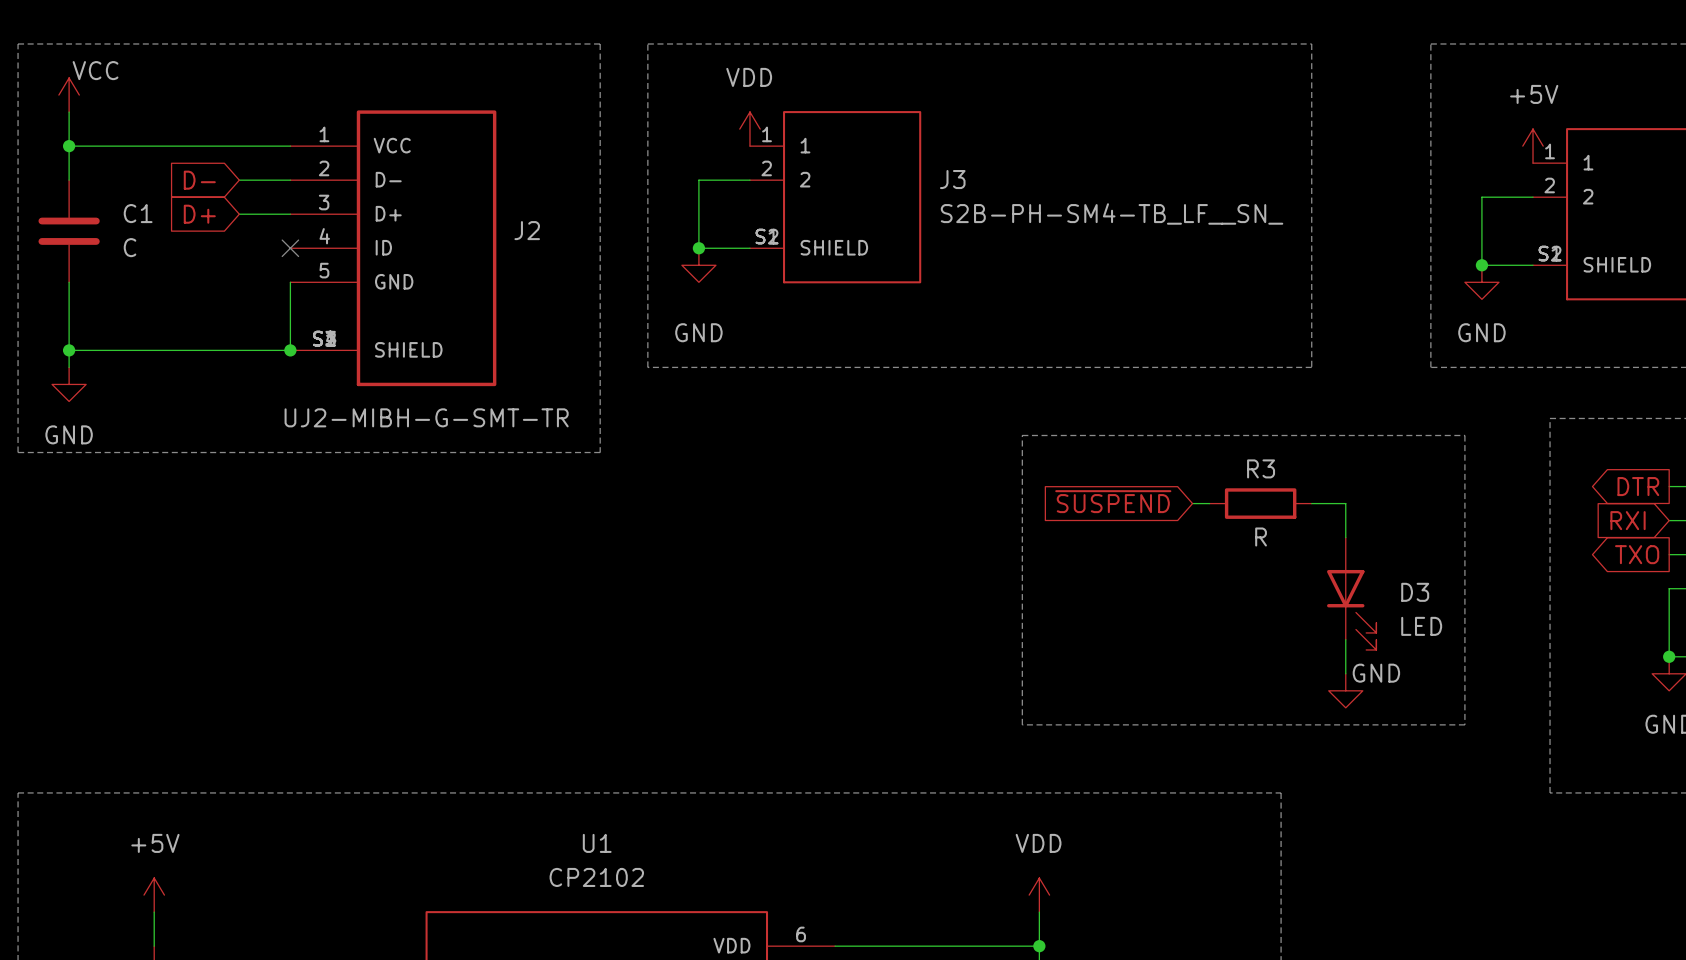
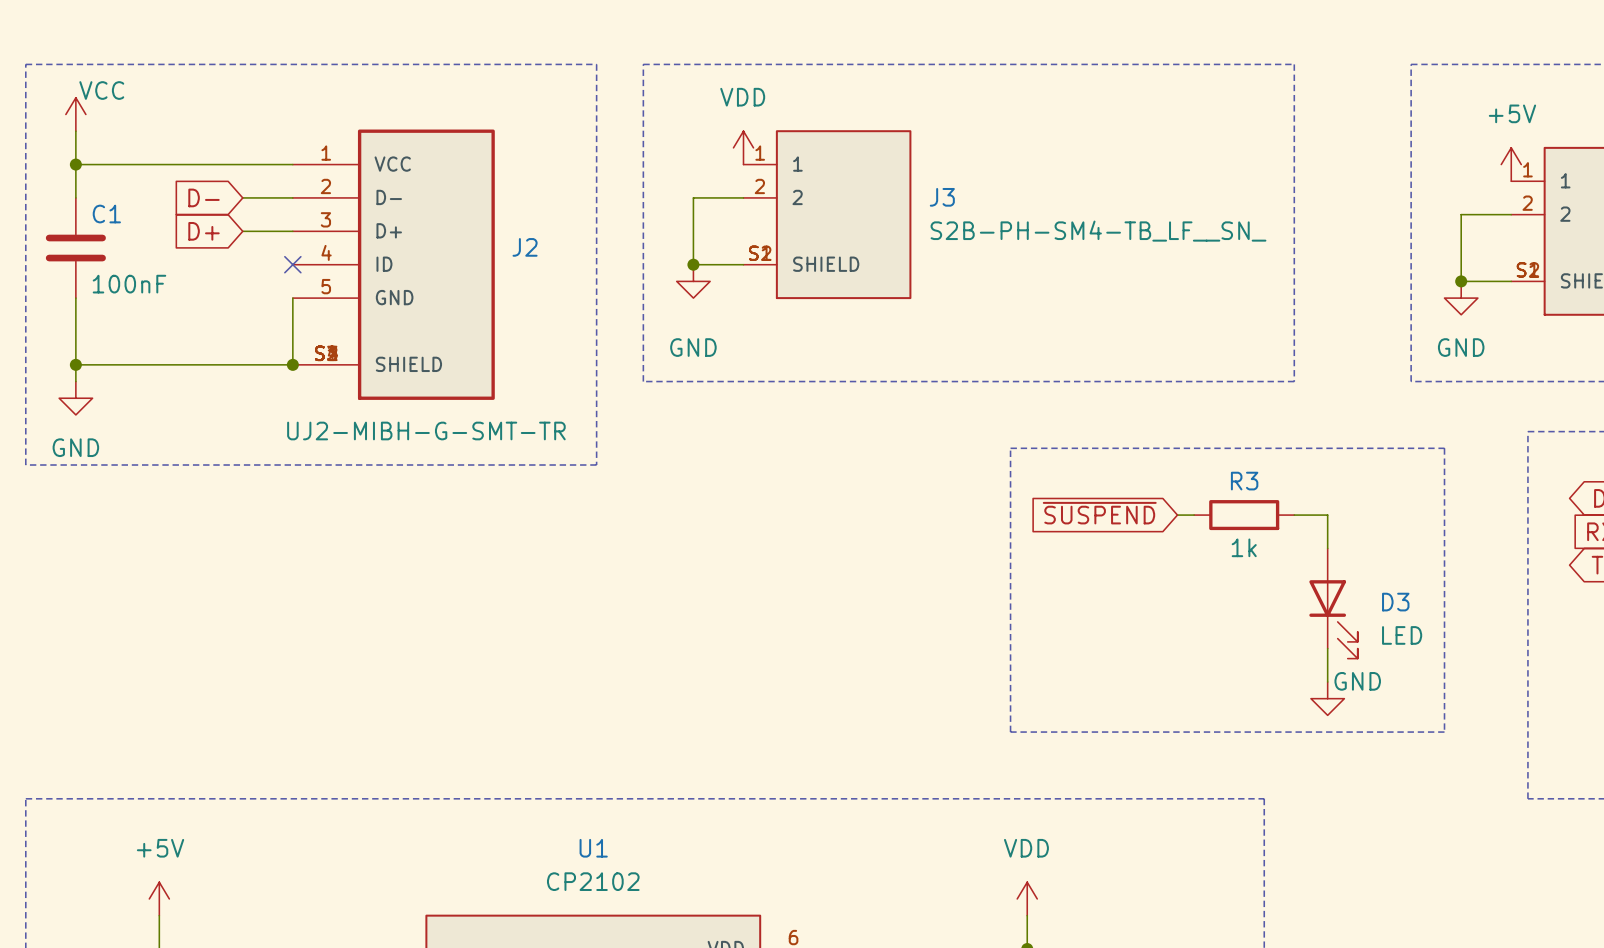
C1 name position: C1 (138, 213) -> C1 (106, 214)
C1 value: C (130, 247) -> 100nF (129, 284)
R3 value: R (1261, 536) -> 1k (1244, 547)

